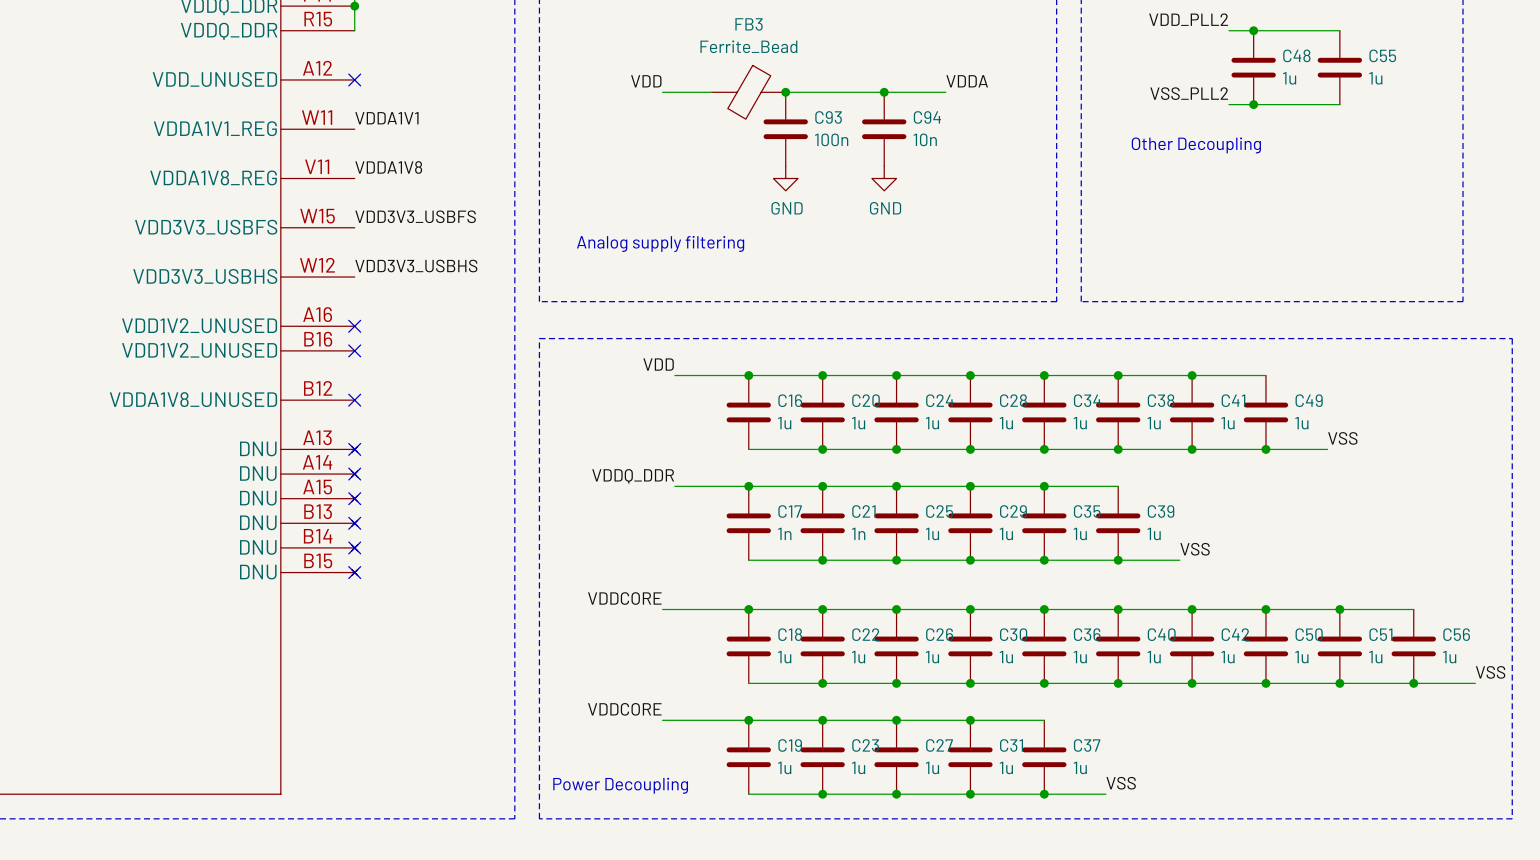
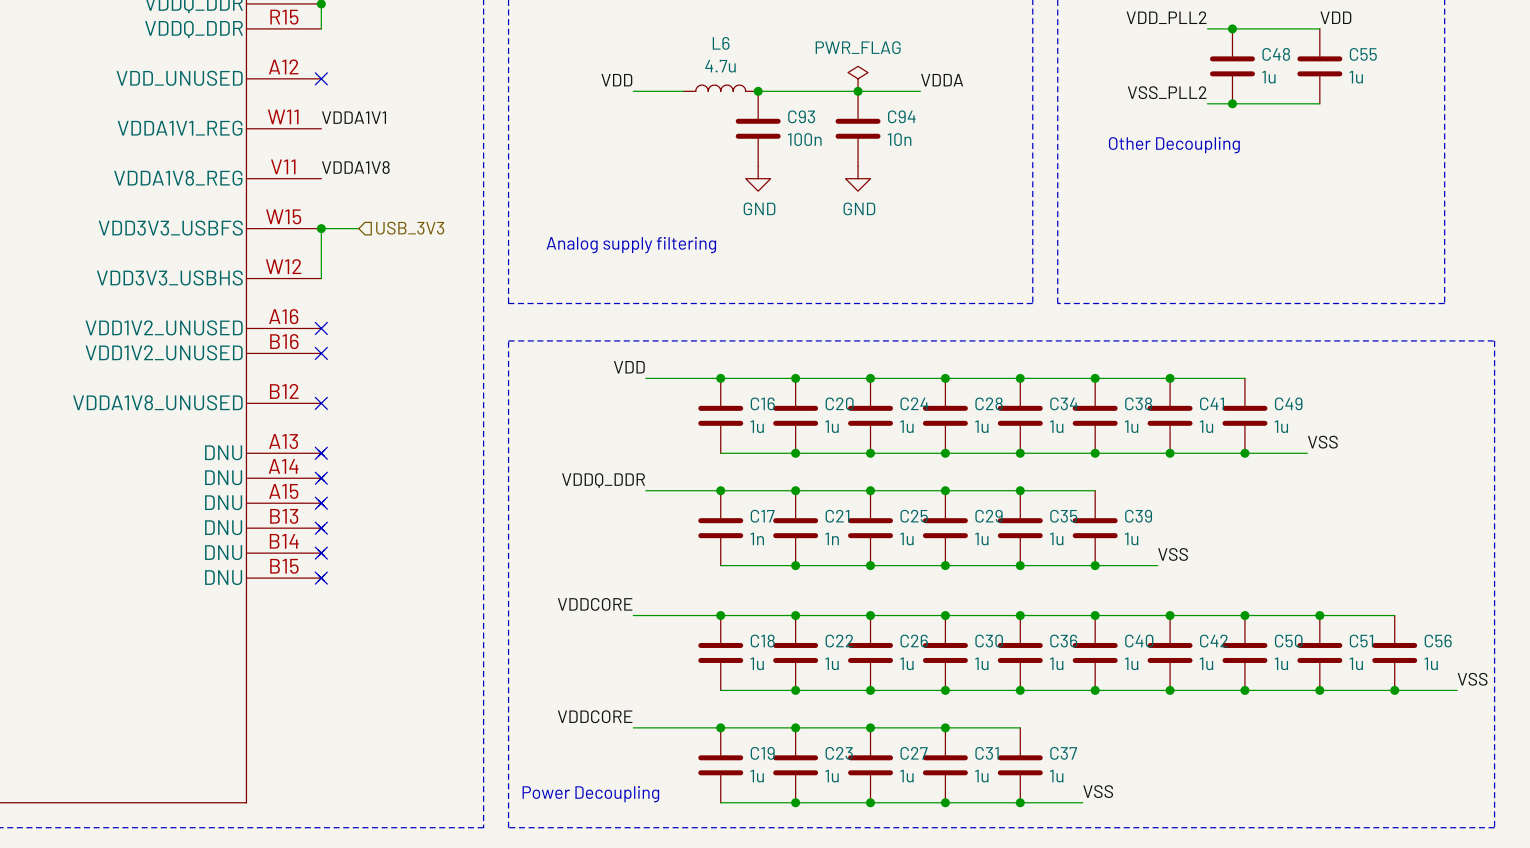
label: none -> VDD (1335, 17)
power symbol: none -> PWR_FLAG (858, 78)
L6: none -> 4.7u (720, 88)
FB3: Ferrite_Bead (748, 92) -> none
label: VDD3V3_USBFS (415, 216) -> none
junction: none -> (321, 228)
wire: none -> (358, 228) (321, 228) (321, 278)
hierarchical label: none -> USB_3V3 (410, 228)
label: VDD3V3_USBHS (416, 266) -> none

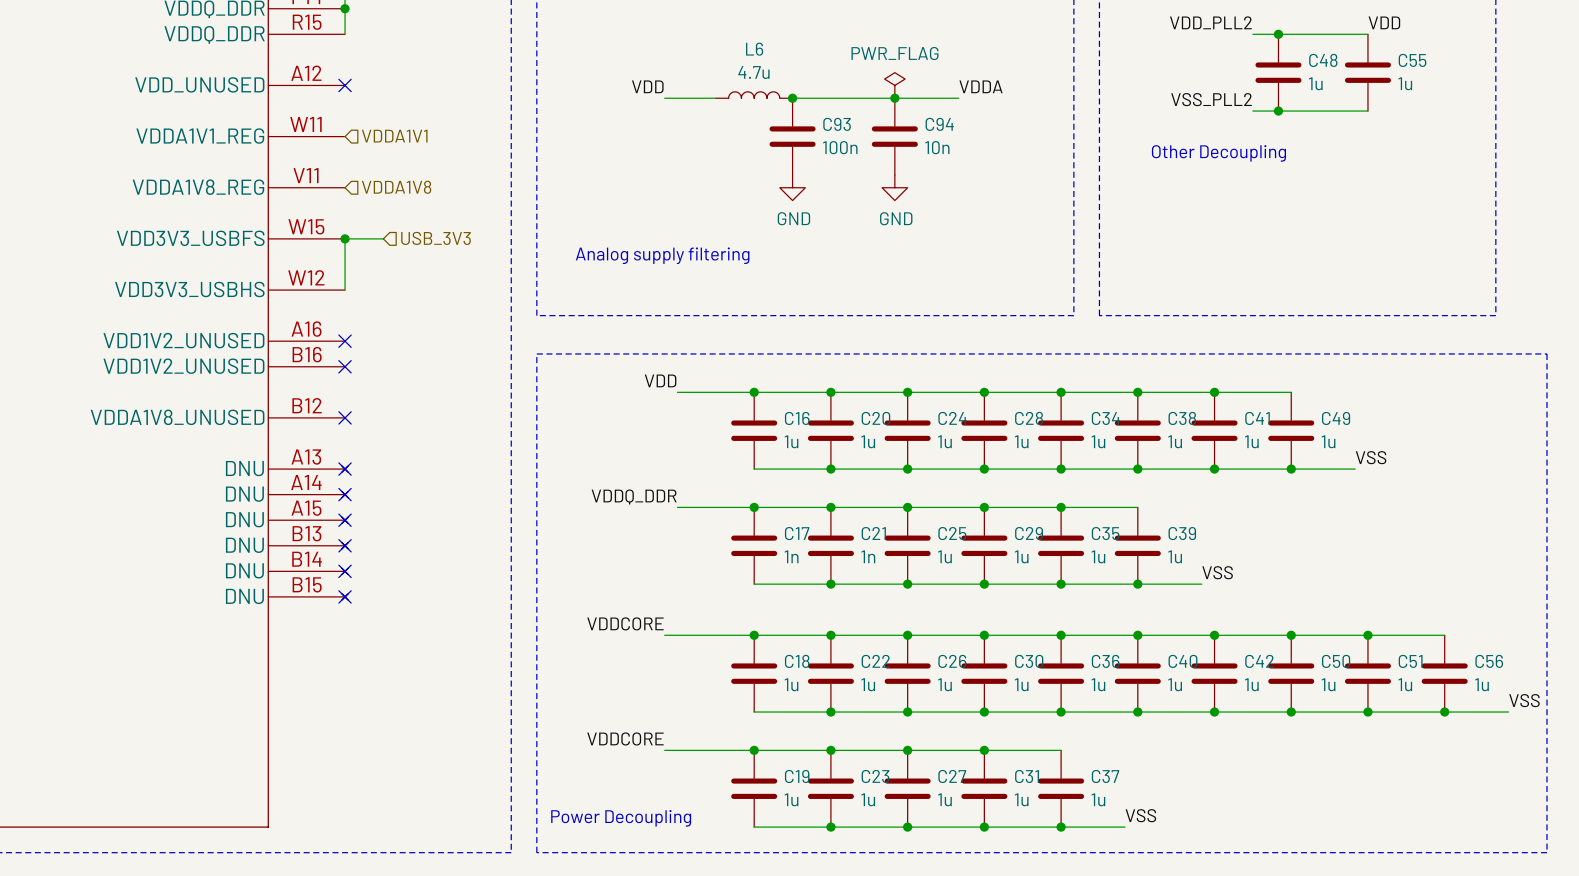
label: VDDA1V1 (354, 117) -> none
hierarchical label: none -> VDDA1V1 (394, 136)
label: VDDA1V8 (355, 167) -> none
hierarchical label: none -> VDDA1V8 (396, 187)

